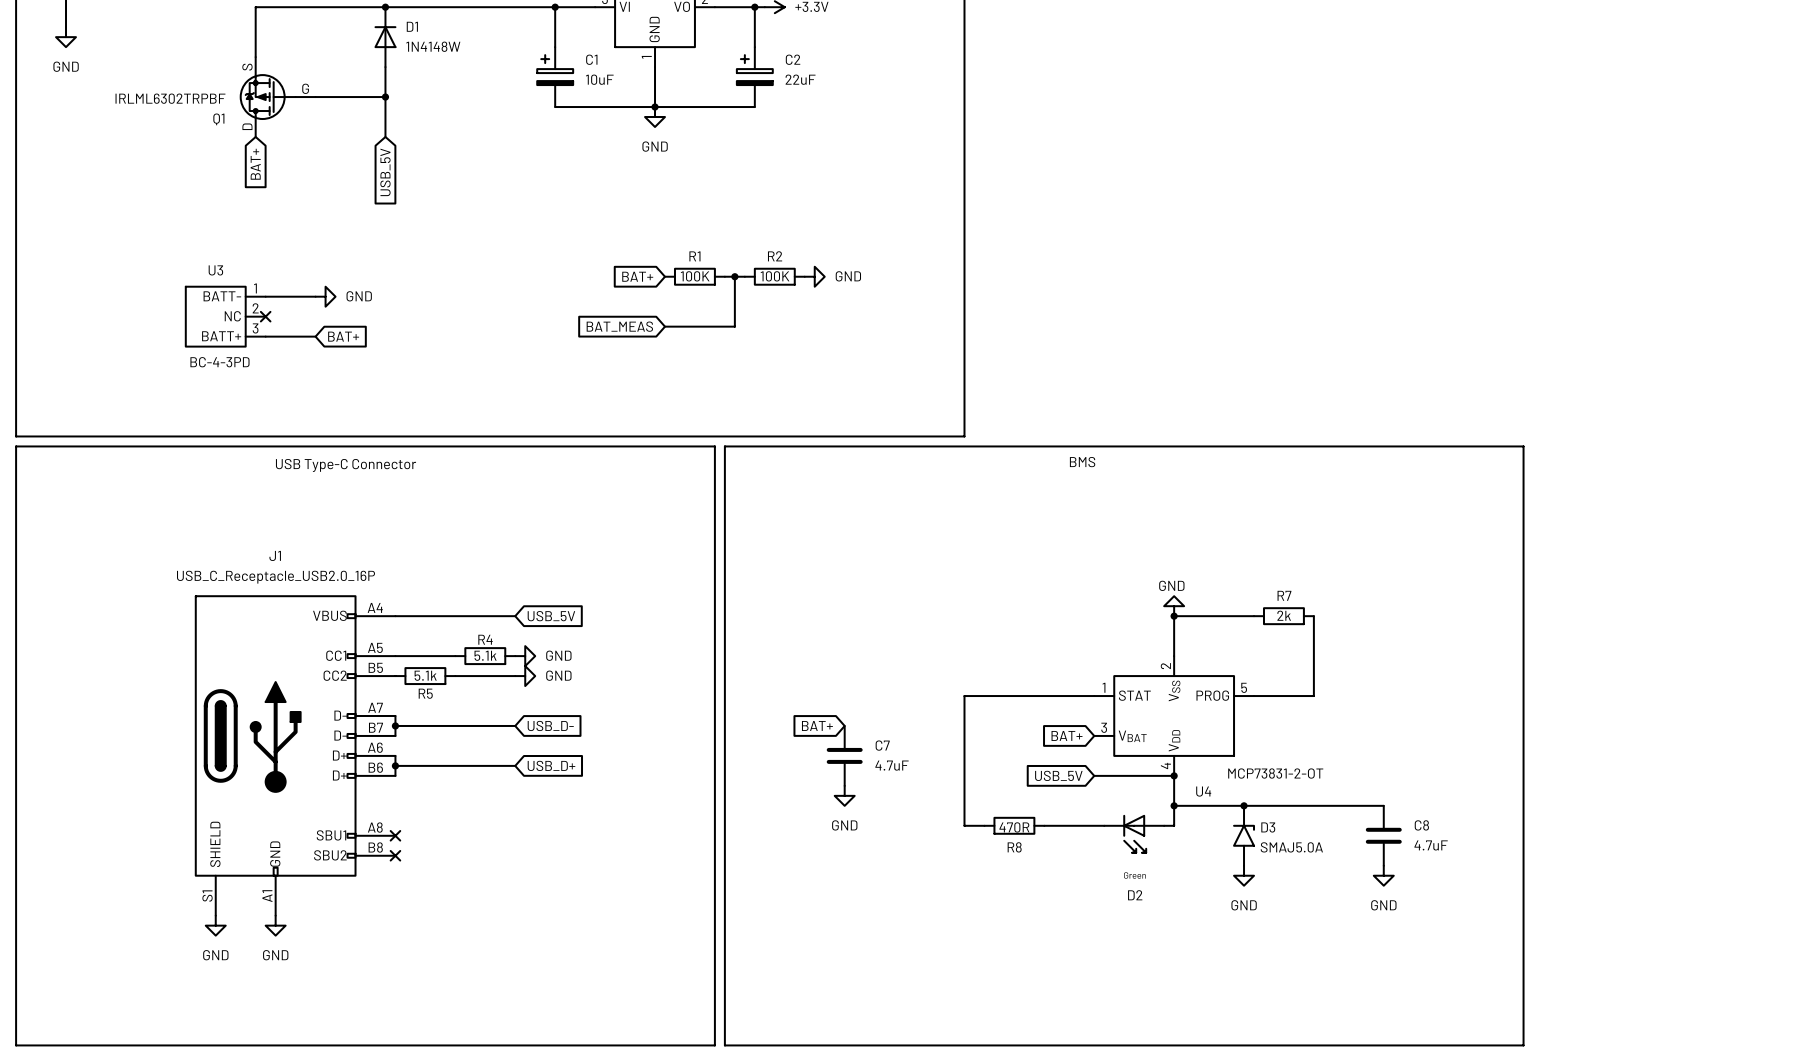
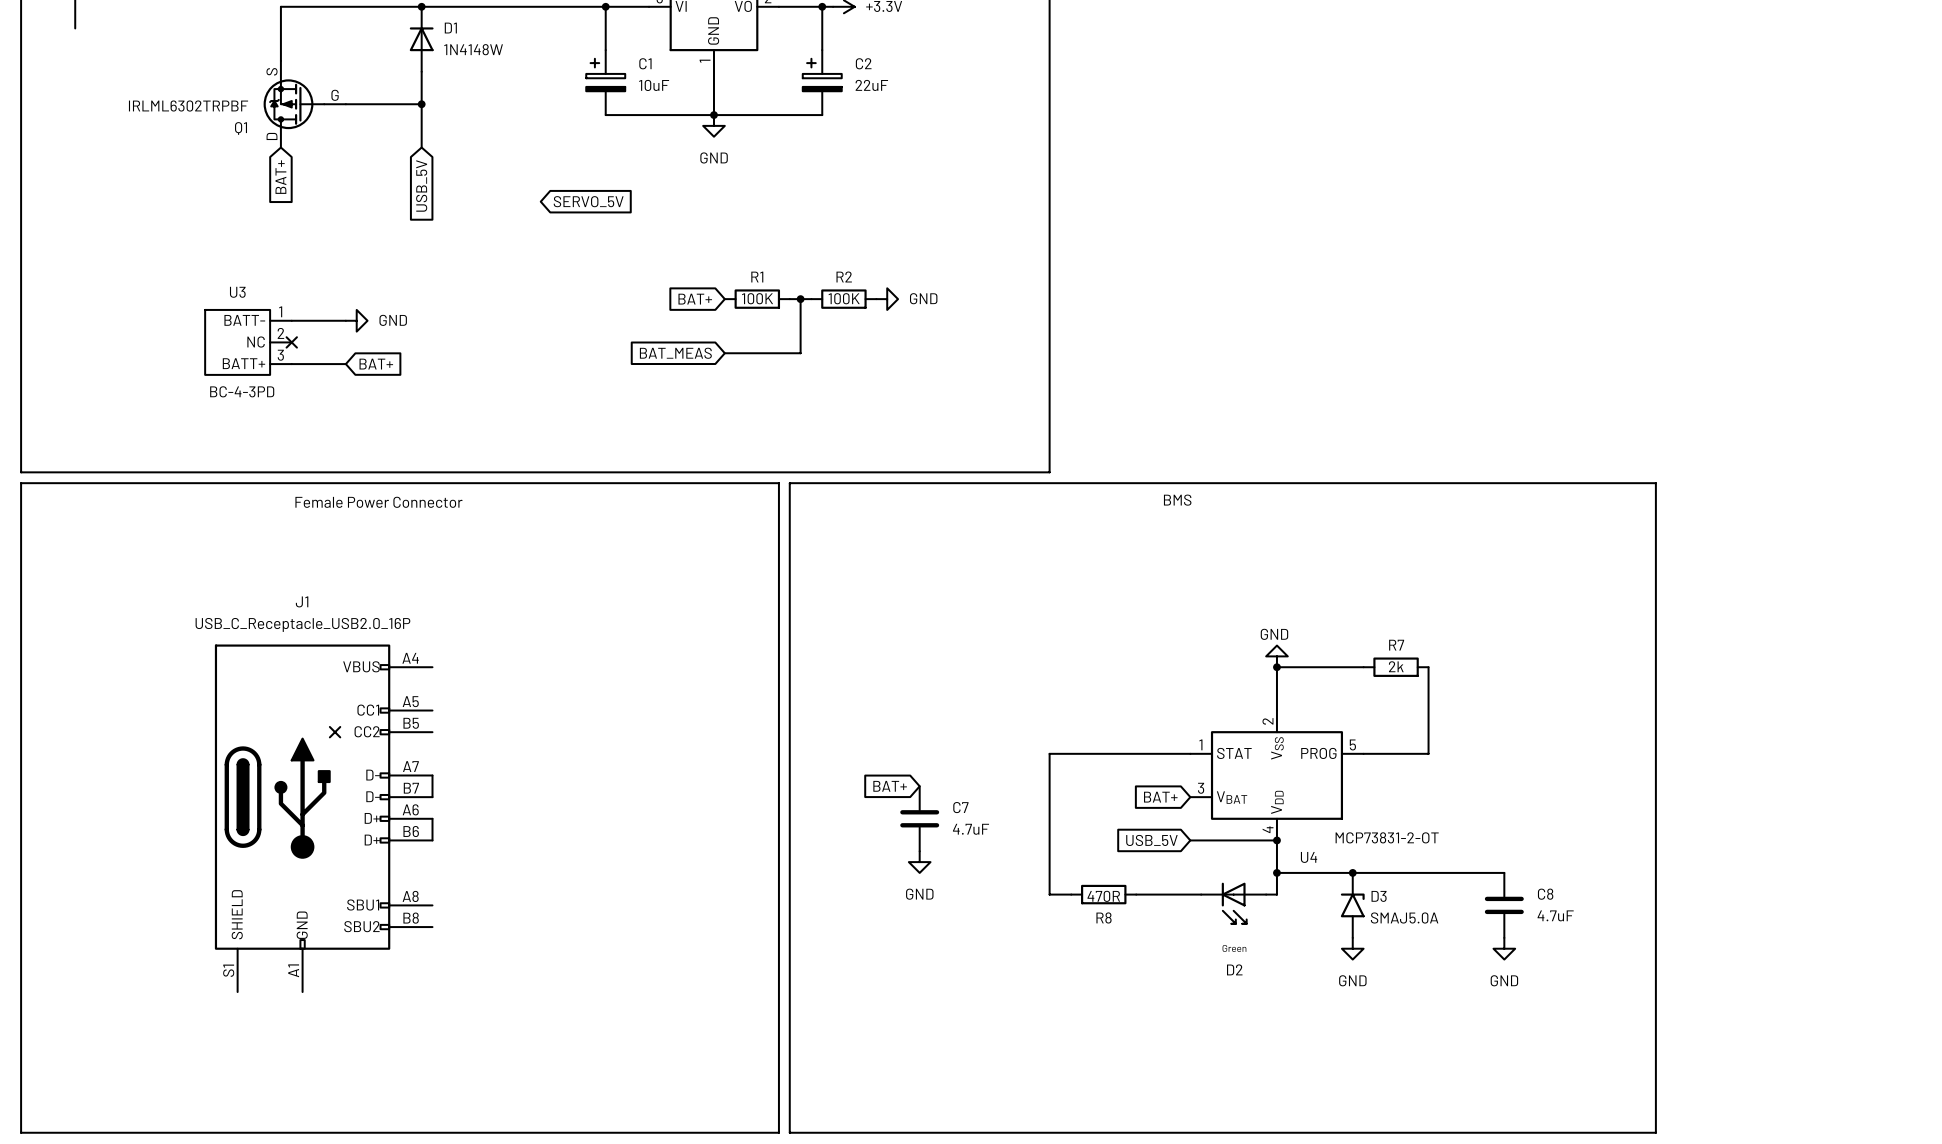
power symbol: GND (66, 37) -> none
global label: none -> SERVO_5V (588, 201)
text: USB Type-C Connector (346, 465) -> Female Power Connector (378, 502)
wire: (395, 616) (515, 616) -> none
global label: USB_5V (551, 616) -> none
wire: (395, 656) (455, 656) -> none
R4: 5.1k (485, 656) -> none
power symbol: GND (525, 656) -> none
no-connect mark: none -> (335, 732)
R5: 5.1k (425, 676) -> none
wire: (455, 676) (515, 676) -> none
power symbol: GND (525, 676) -> none
wire: (395, 725) (515, 725) -> none
junction: (395, 725) -> none
global label: USB_D- (550, 725) -> none
wire: (395, 765) (515, 765) -> none
junction: (395, 765) -> none
global label: USB_D+ (551, 765) -> none
no-connect mark: (395, 835) -> none
no-connect mark: (395, 855) -> none
power symbol: GND (215, 925) -> none
power symbol: GND (275, 925) -> none

